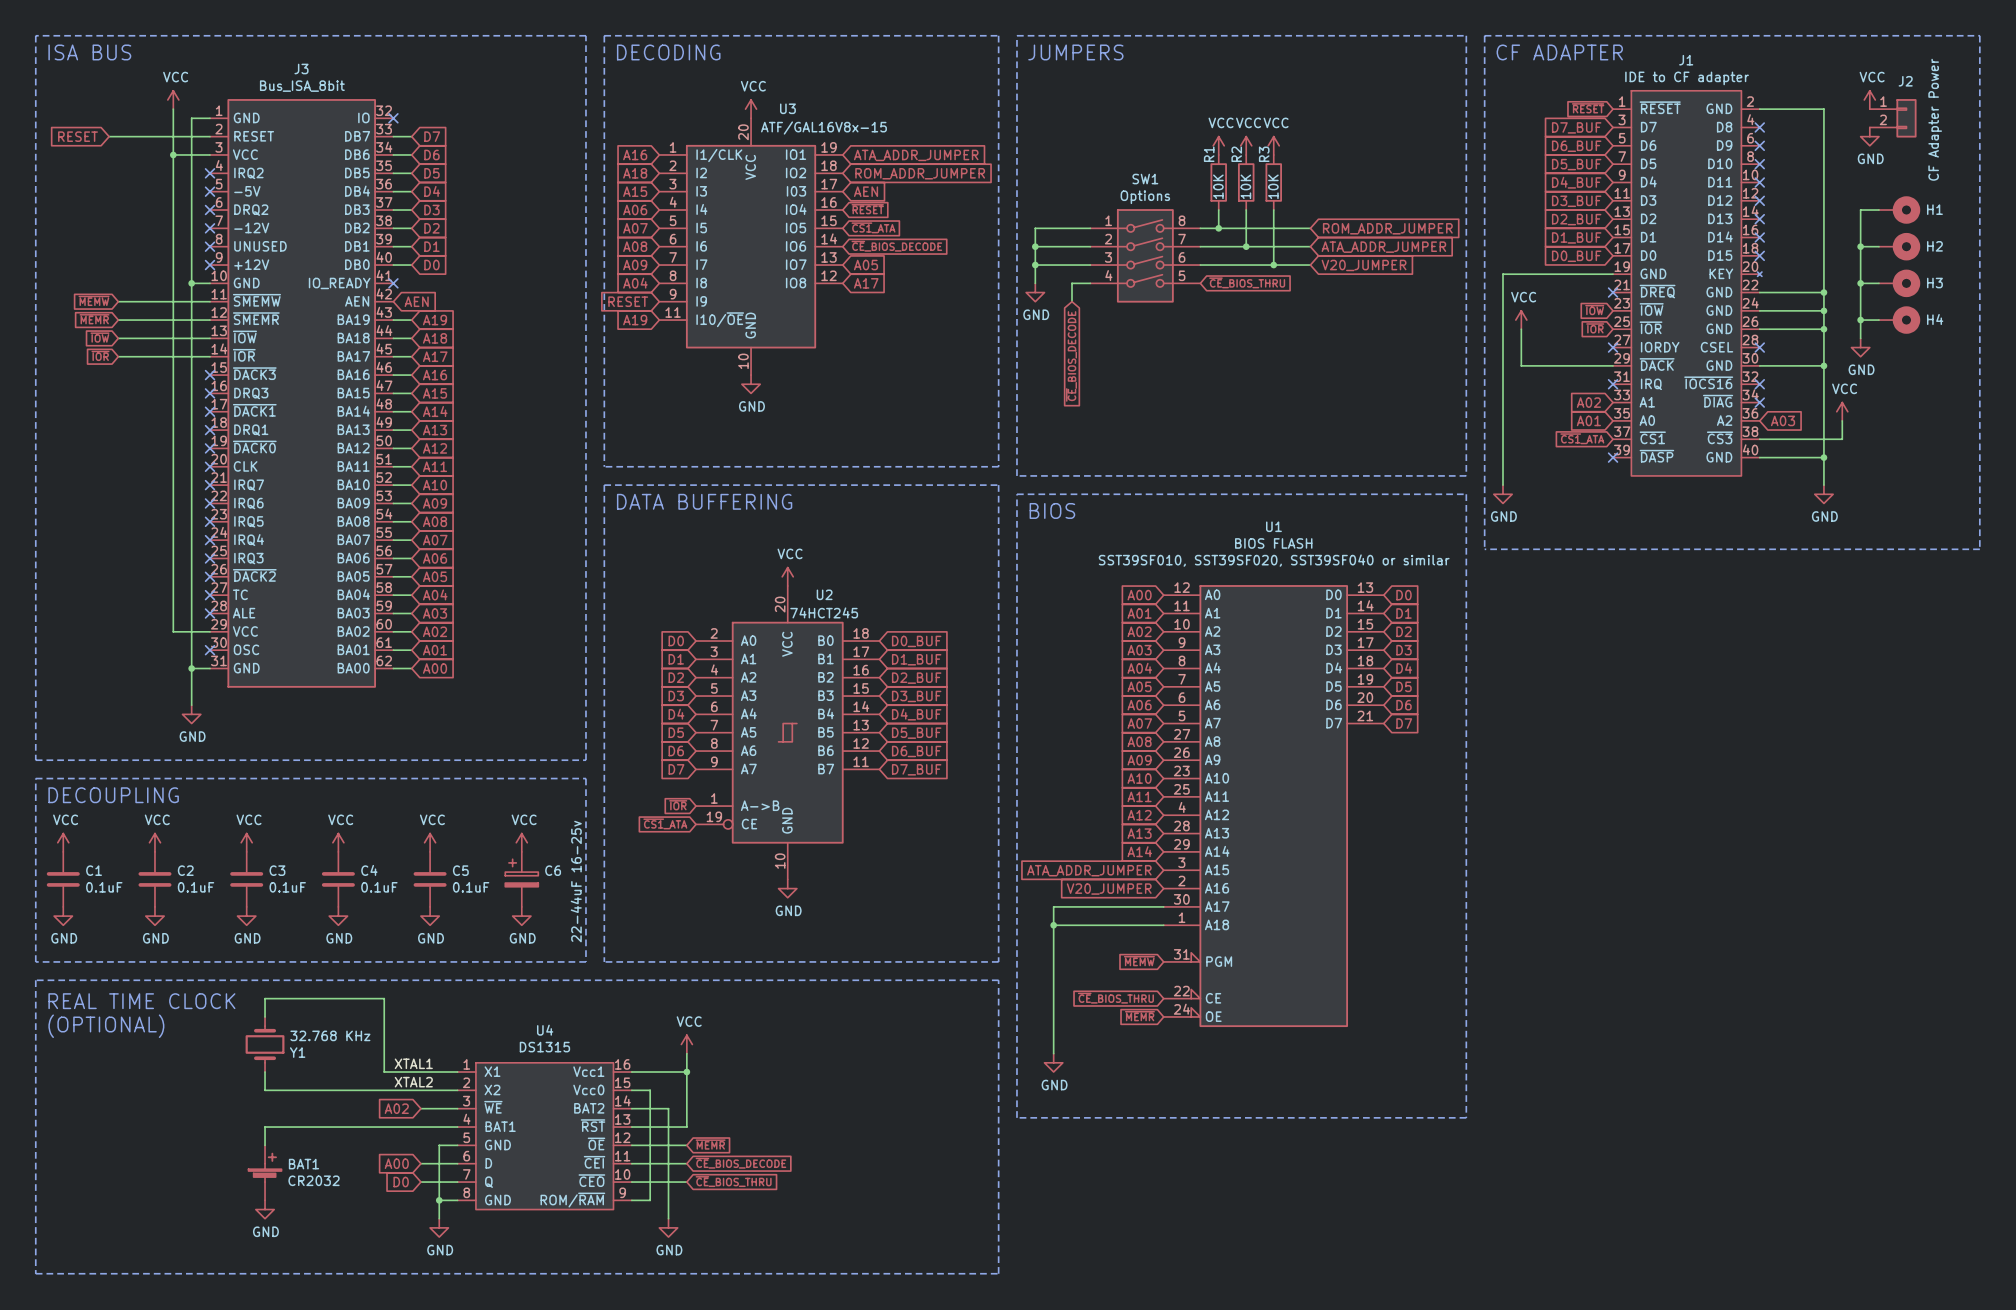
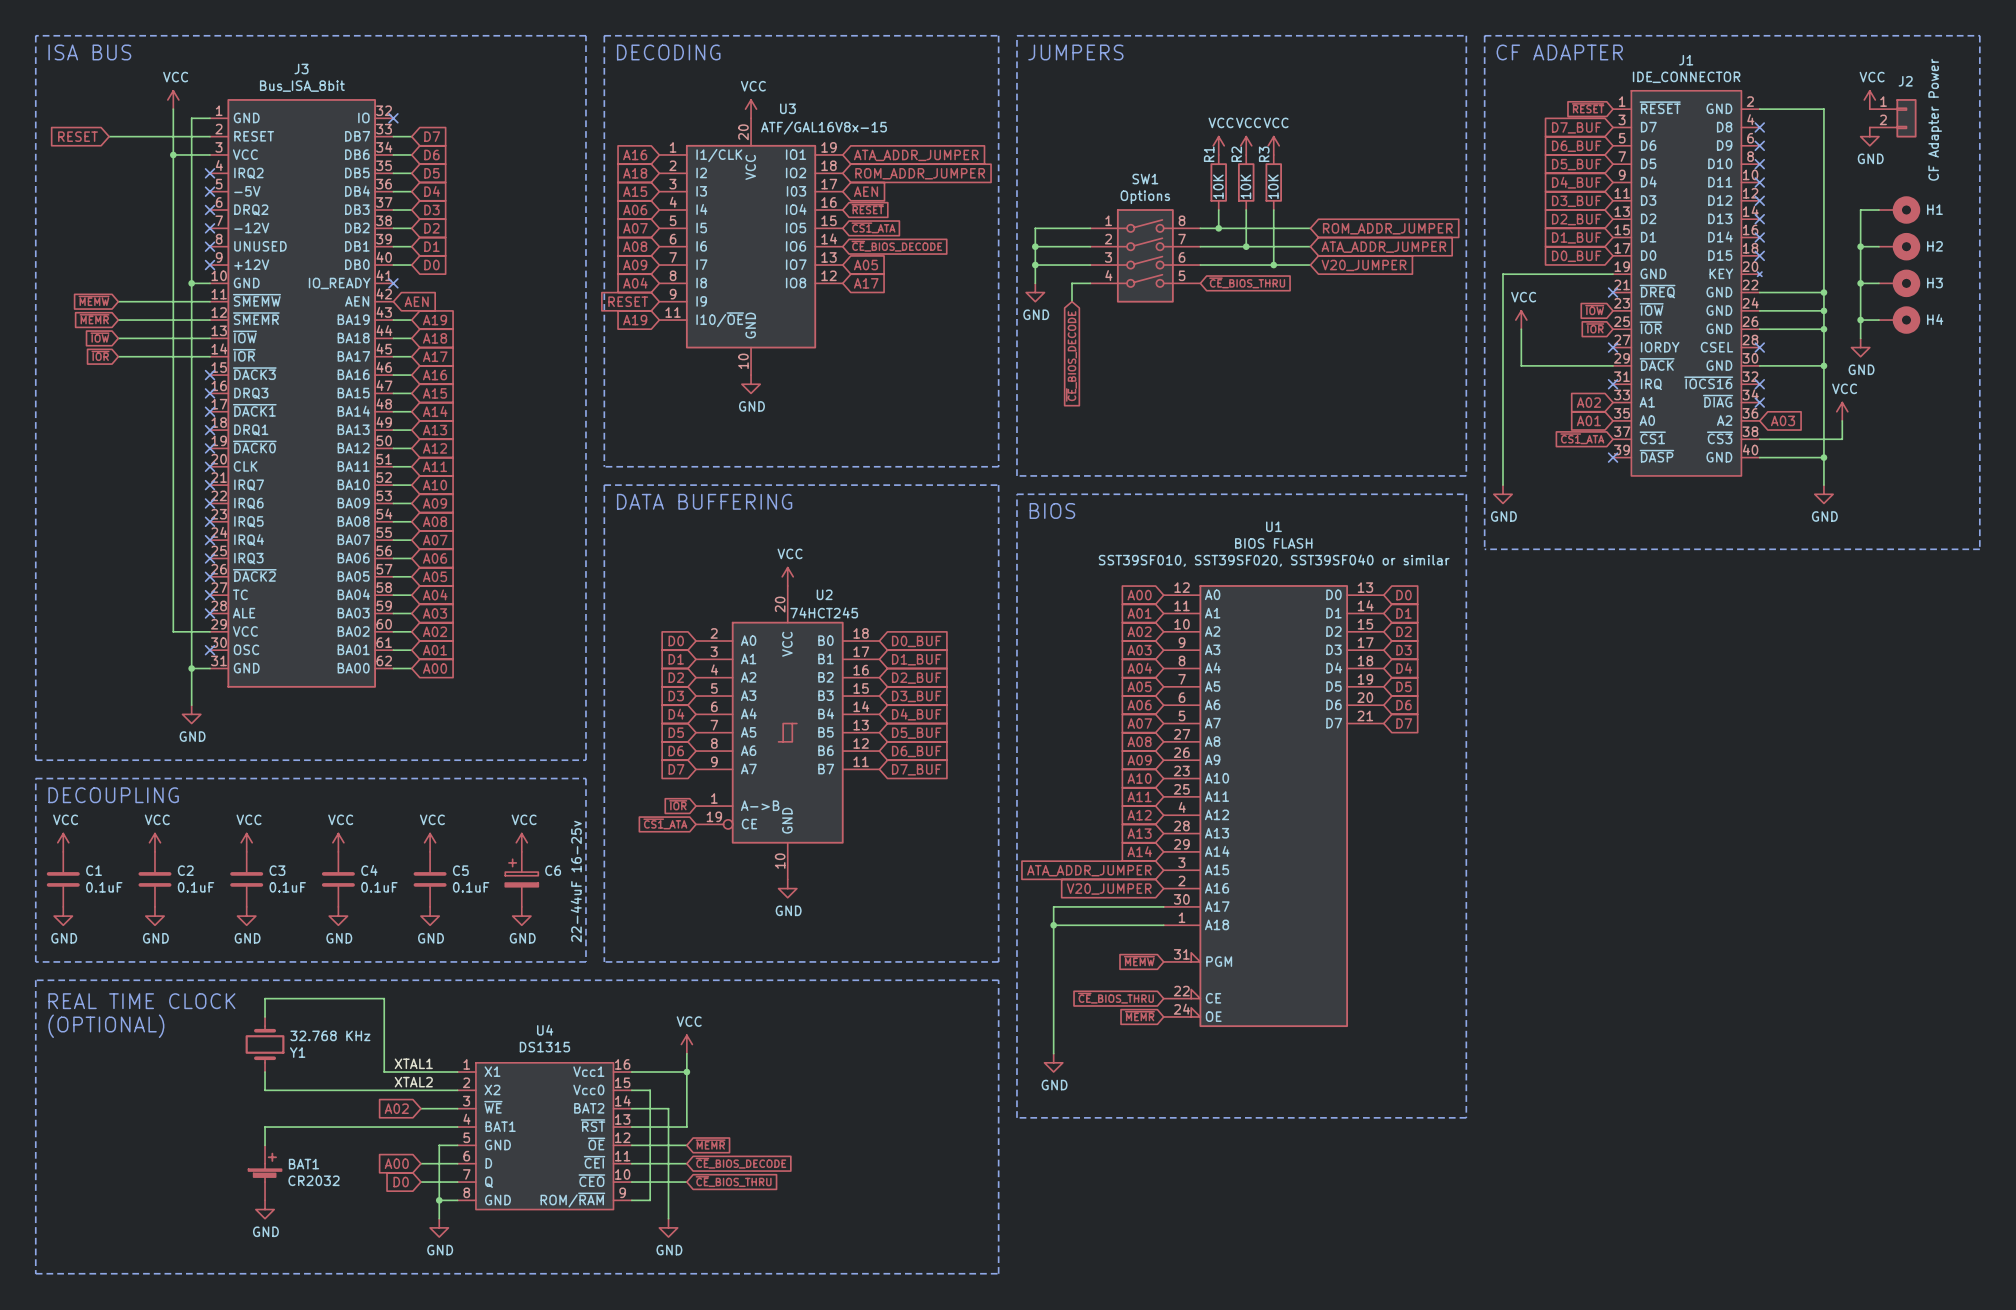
J1 value: IDE to CF adapter (1687, 78) -> IDE_CONNECTOR (1686, 77)

